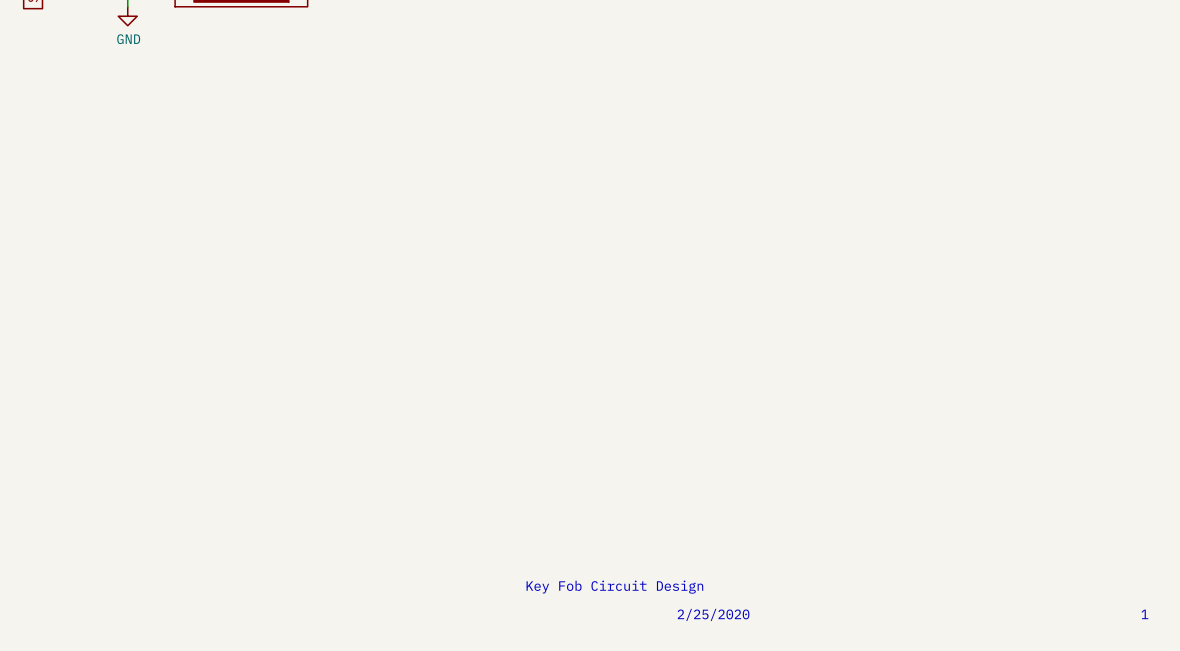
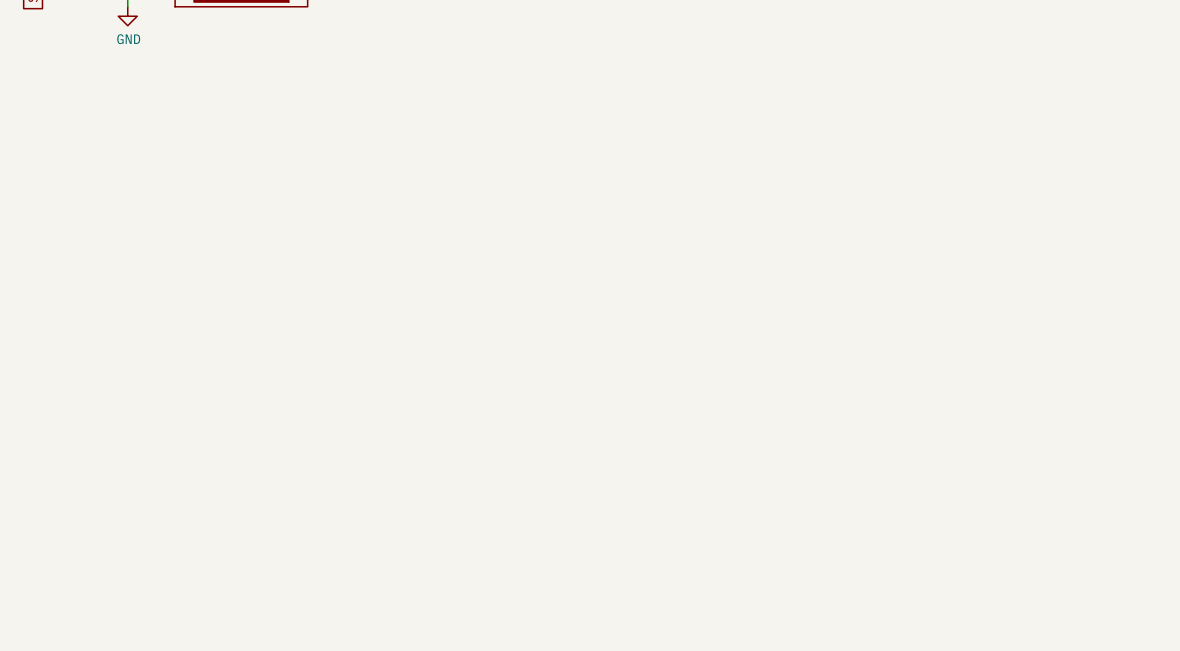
text: Key Fob Circuit Design (614, 587) -> none
text: 2/25/2020 (713, 614) -> none
text: 1 (1144, 614) -> none

